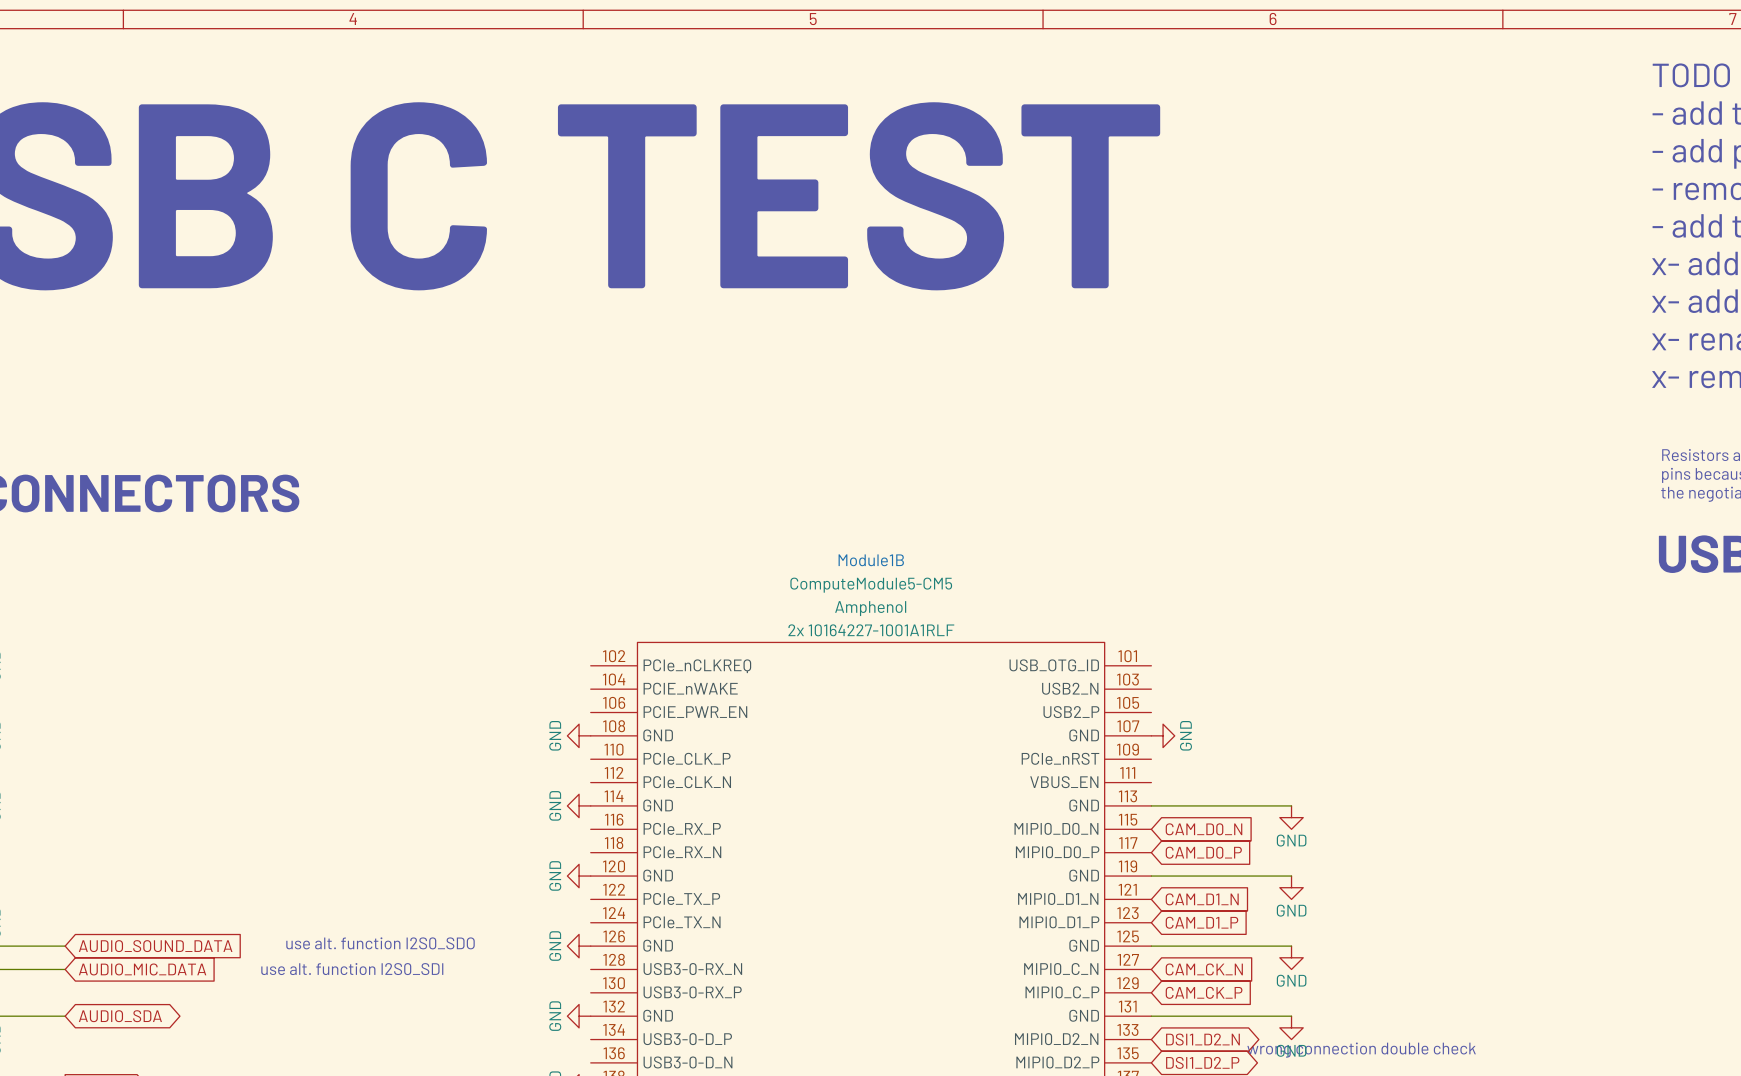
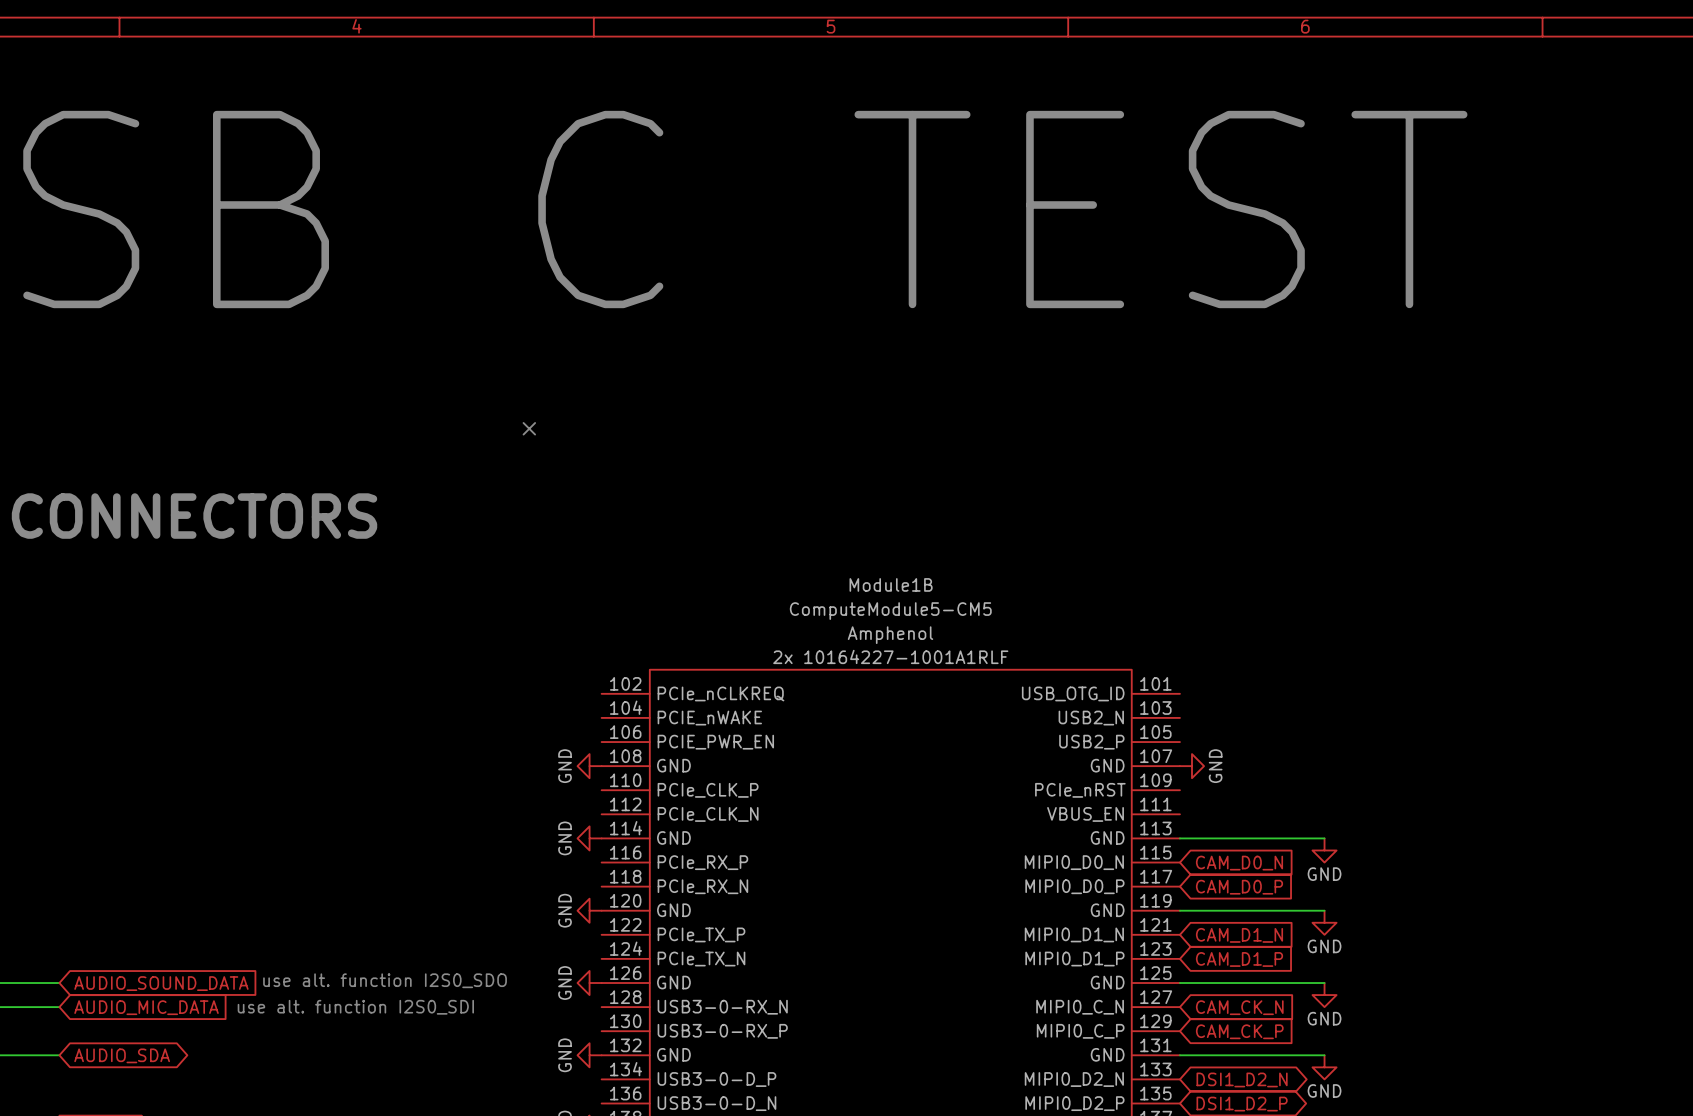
no-connect mark: none -> (529, 428)
text: wrong connection double check (1361, 1050) -> none

